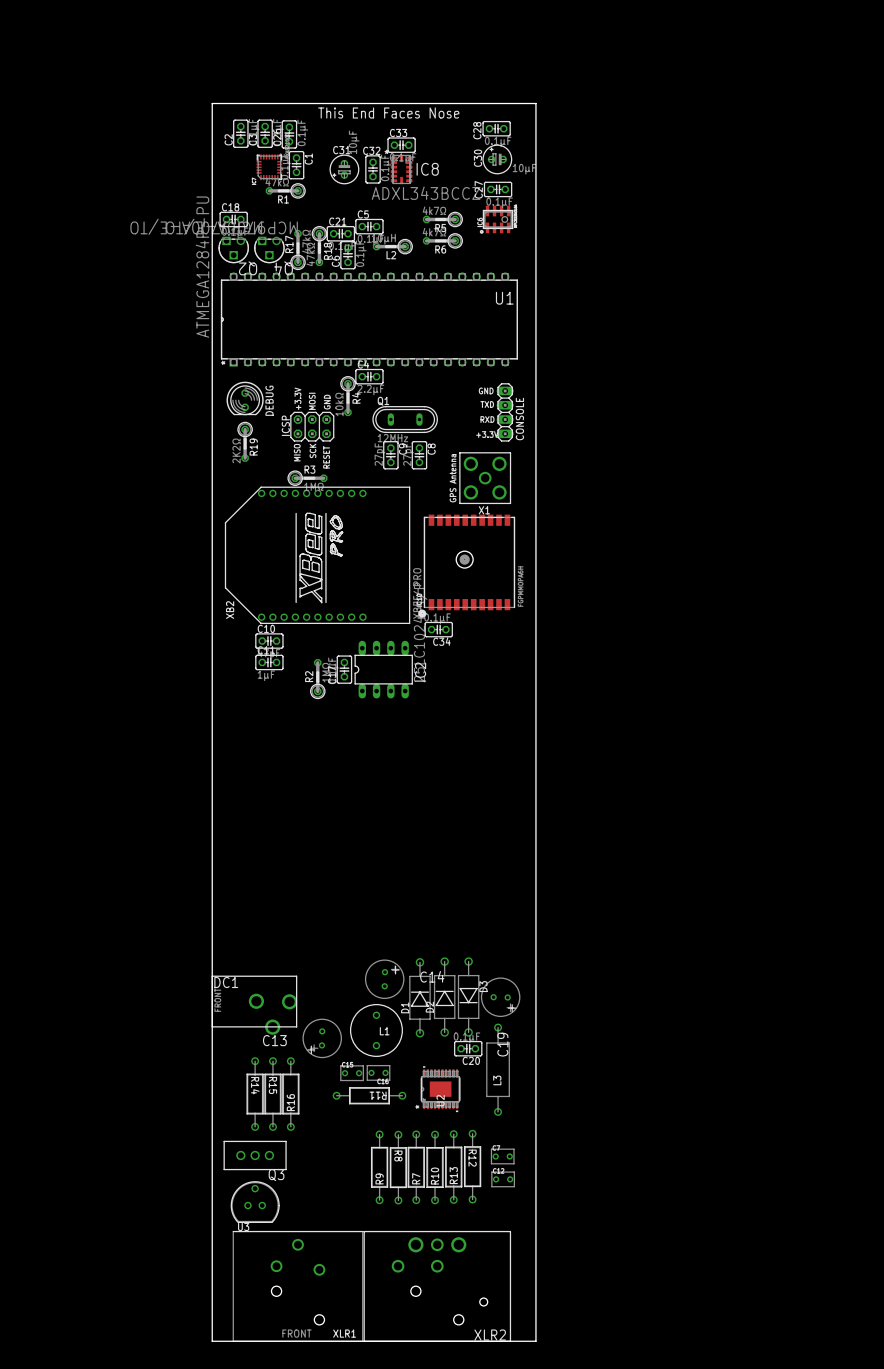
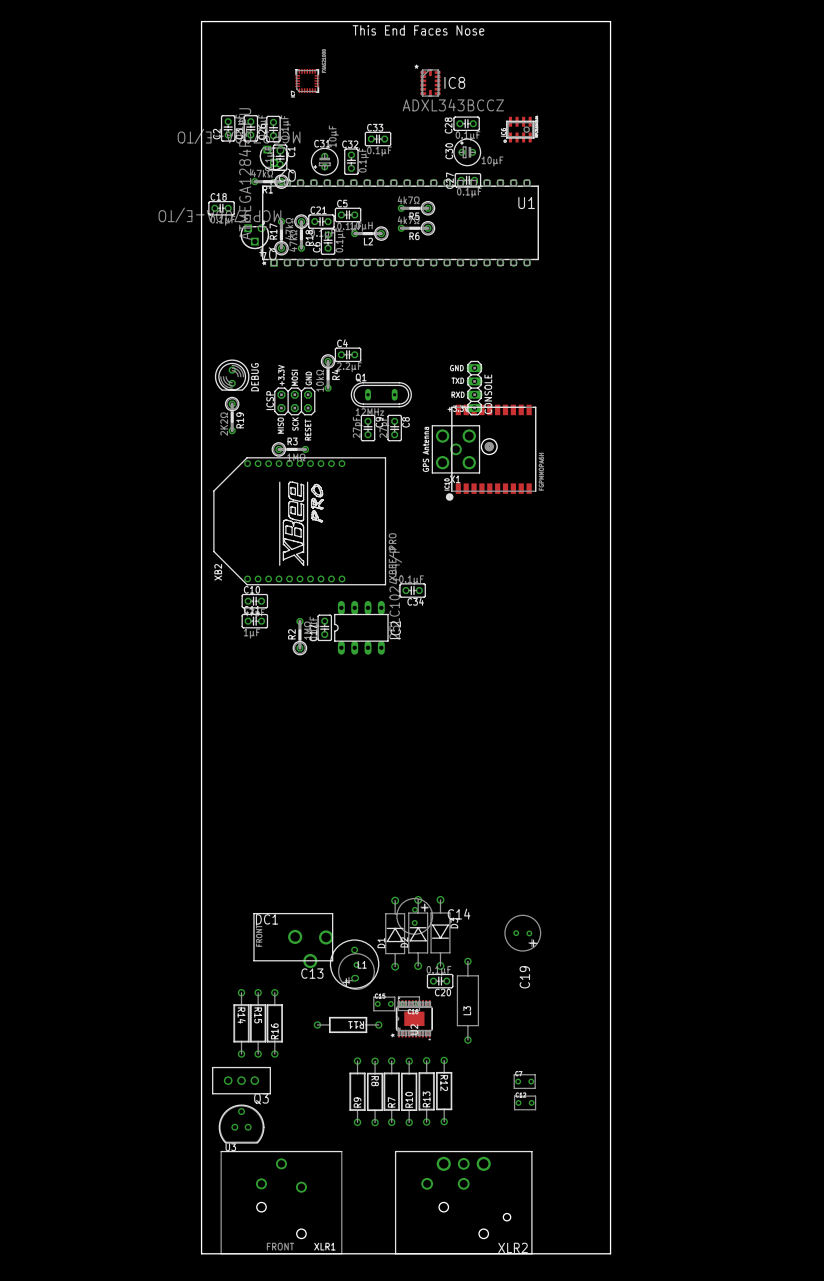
board edge: (212, 103) (535, 103) (535, 1341) -> (201, 100) (201, 21) (610, 21) (610, 1253) (503, 1253)
text position: This End Faces Nose (388, 113) -> This End Faces Nose (418, 30)
part position: (269, 167) -> (307, 81)
IC8 position: (401, 169) -> (430, 83)
part position: (496, 219) -> (518, 129)
Q2 position: (233, 249) -> (273, 157)
U1 position: (369, 319) -> (400, 222)
part position: (466, 566) -> (490, 452)
C14 position: (384, 979) -> (414, 916)
C19 position: (500, 997) -> (522, 933)
DC1 position: (254, 1005) -> (293, 940)
C13 position: (322, 1038) -> (356, 971)
part position: (378, 1072) -> (408, 1003)
part position: (352, 1073) -> (384, 1003)
part position: (502, 1156) -> (524, 1081)
part position: (503, 1179) -> (525, 1102)
XLR2 position: (437, 1286) -> (463, 1202)

